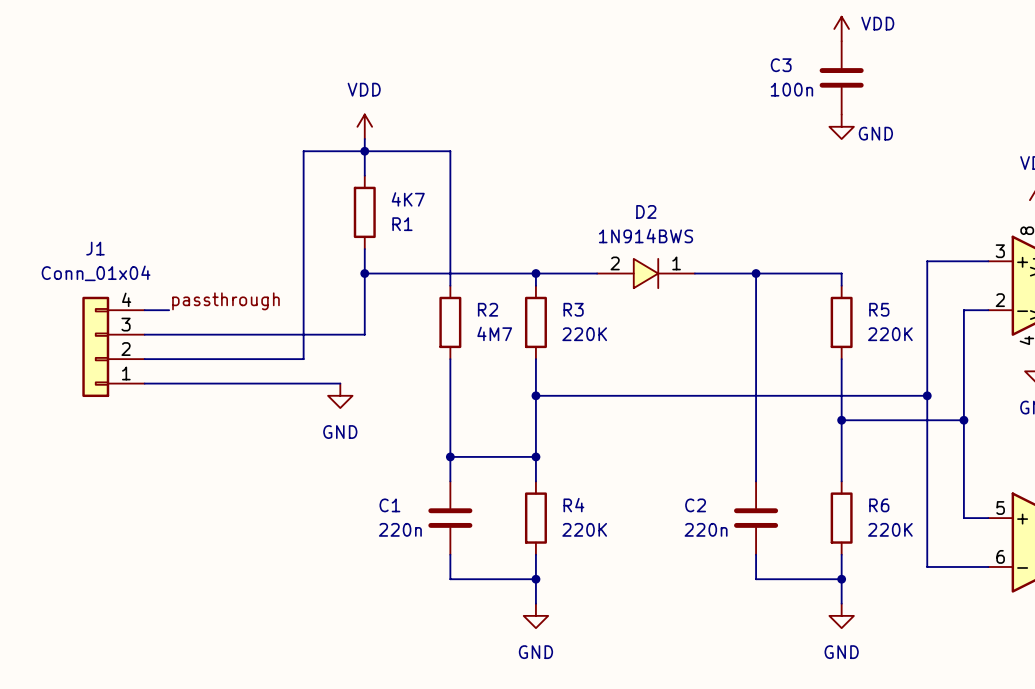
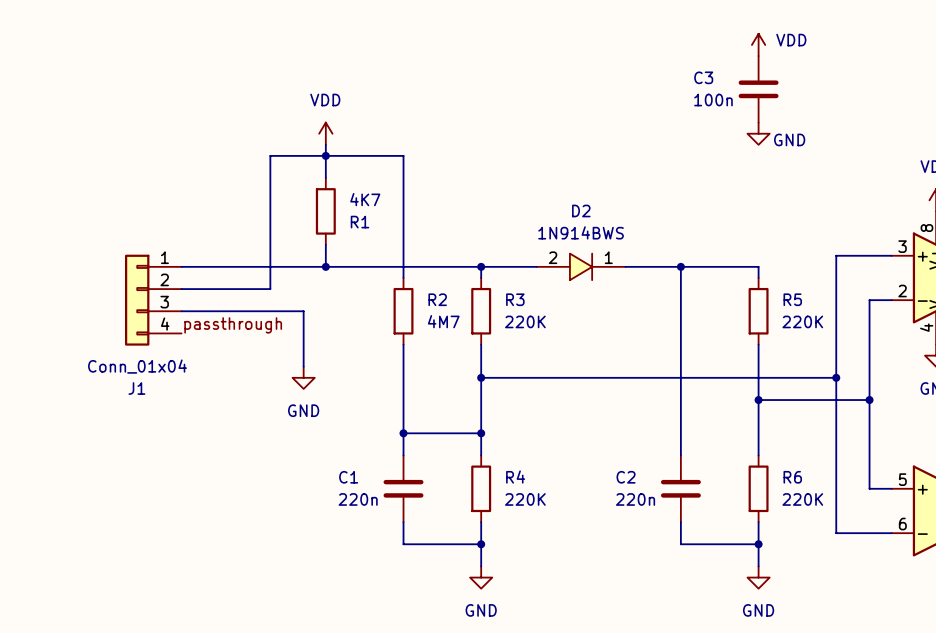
wire: (364, 273) (364, 334) (144, 334) -> (325, 266) (181, 266)
wire: (303, 297) (303, 359) (144, 359) -> (270, 289) (181, 289)
label position: passthrough (225, 301) -> passthrough (233, 325)
J1 flip: as is (95, 346) -> up-down (137, 300)
J1 position: (113, 346) -> (153, 300)
wire: (144, 383) (340, 383) -> (181, 311) (303, 311) (303, 366)

